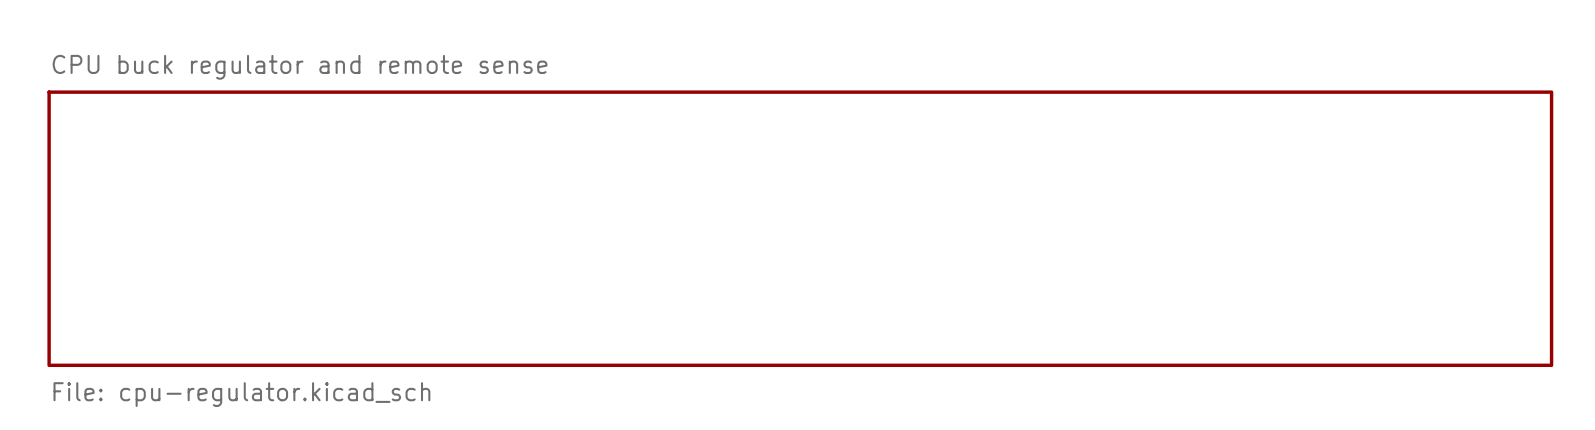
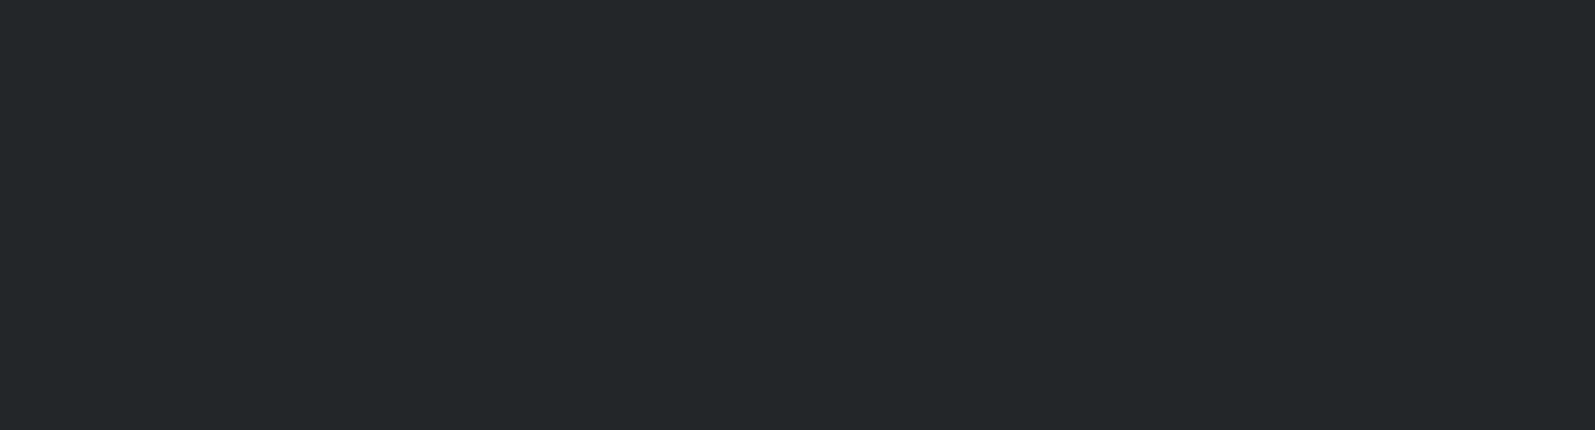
sheet CPU buck regulator and remote sense: File: cpu-regulator.kicad_sch (800, 228) -> none

